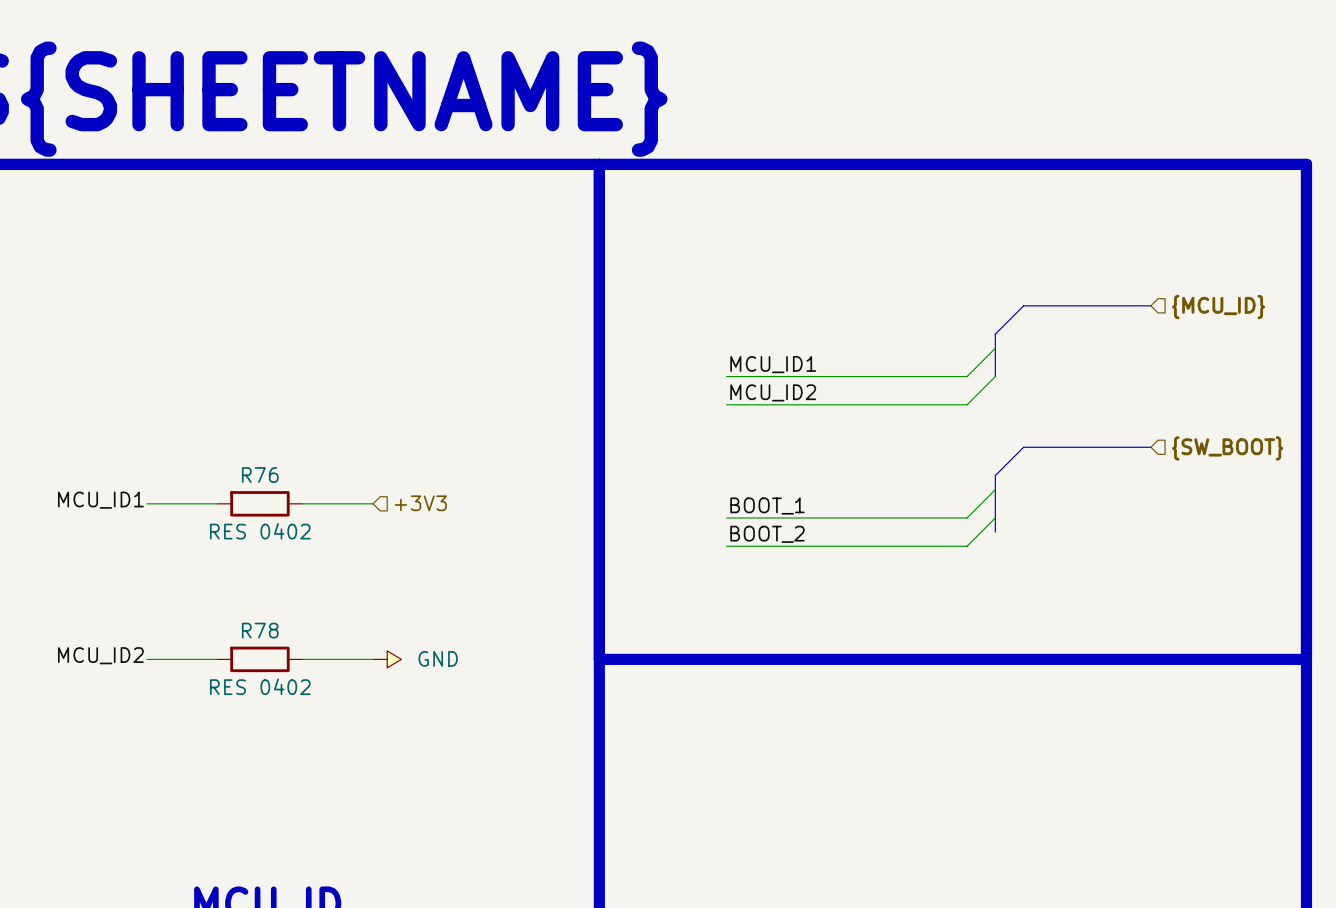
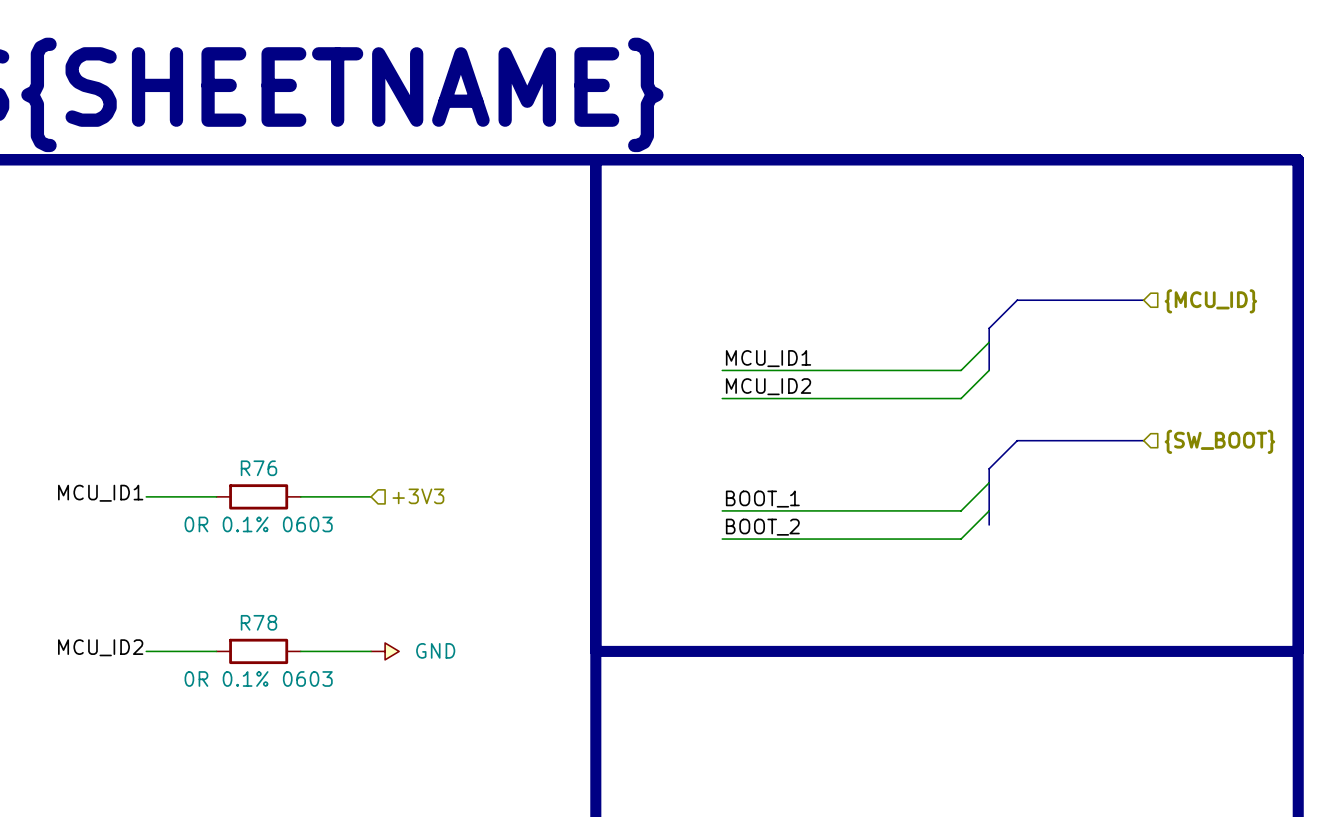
R76 value: RES 0402 (260, 531) -> 0R 0.1% 0603 (258, 524)
R78 value: RES 0402 (260, 686) -> 0R 0.1% 0603 (258, 678)

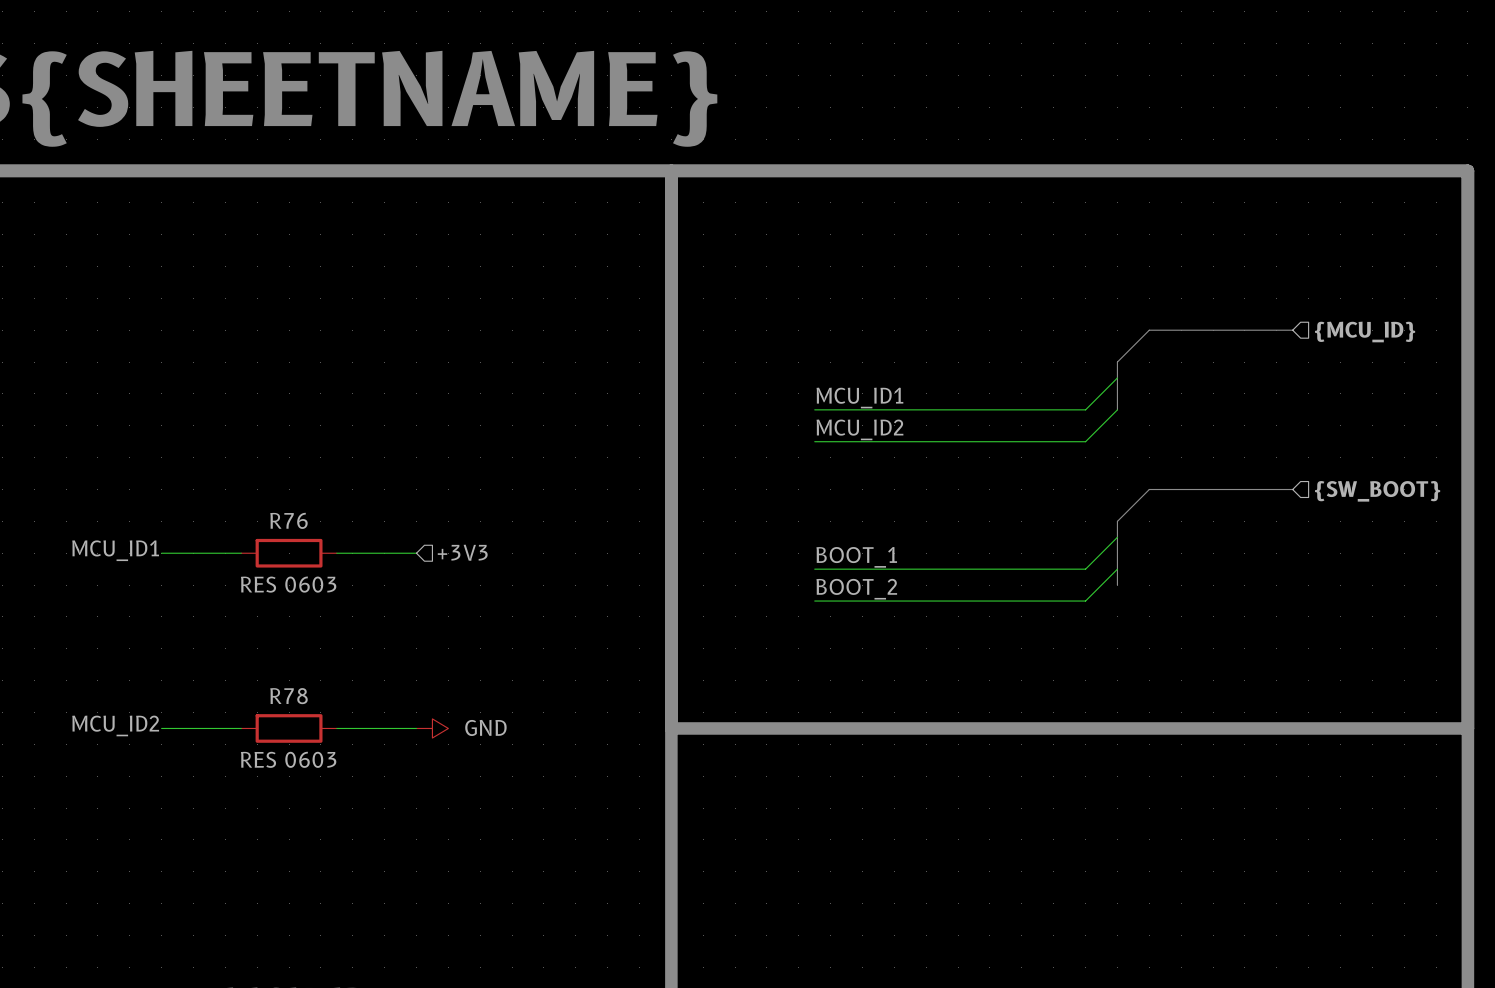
R76 value: 0R 0.1% 0603 (258, 524) -> RES 0603 (288, 584)
R78 value: 0R 0.1% 0603 (258, 678) -> RES 0603 (288, 759)

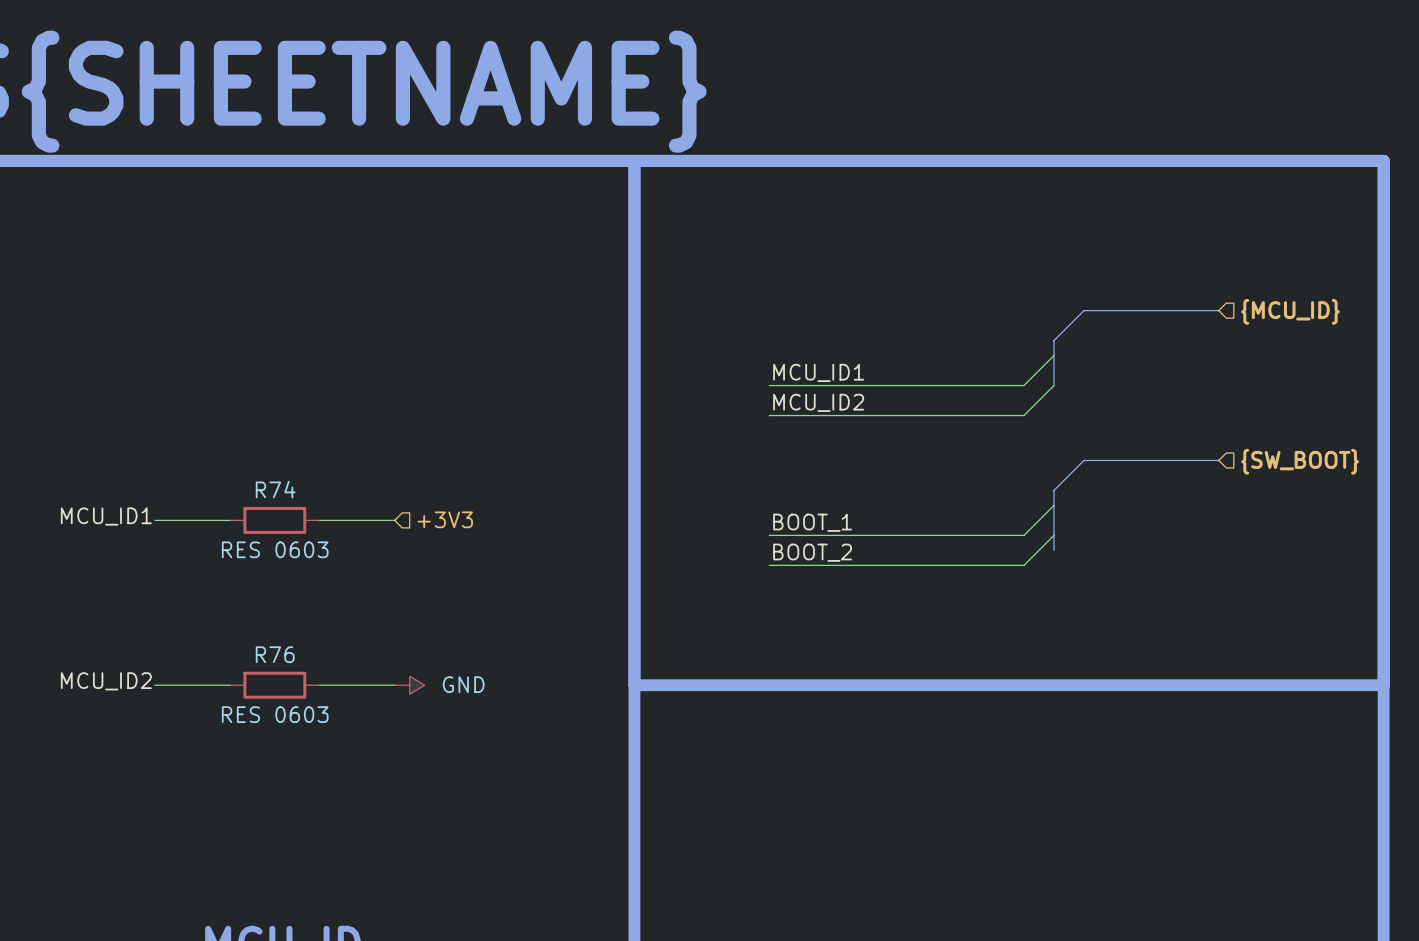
R76 name: R76 (288, 520) -> R74 (275, 489)
R78 name: R78 (288, 696) -> R76 (275, 654)

